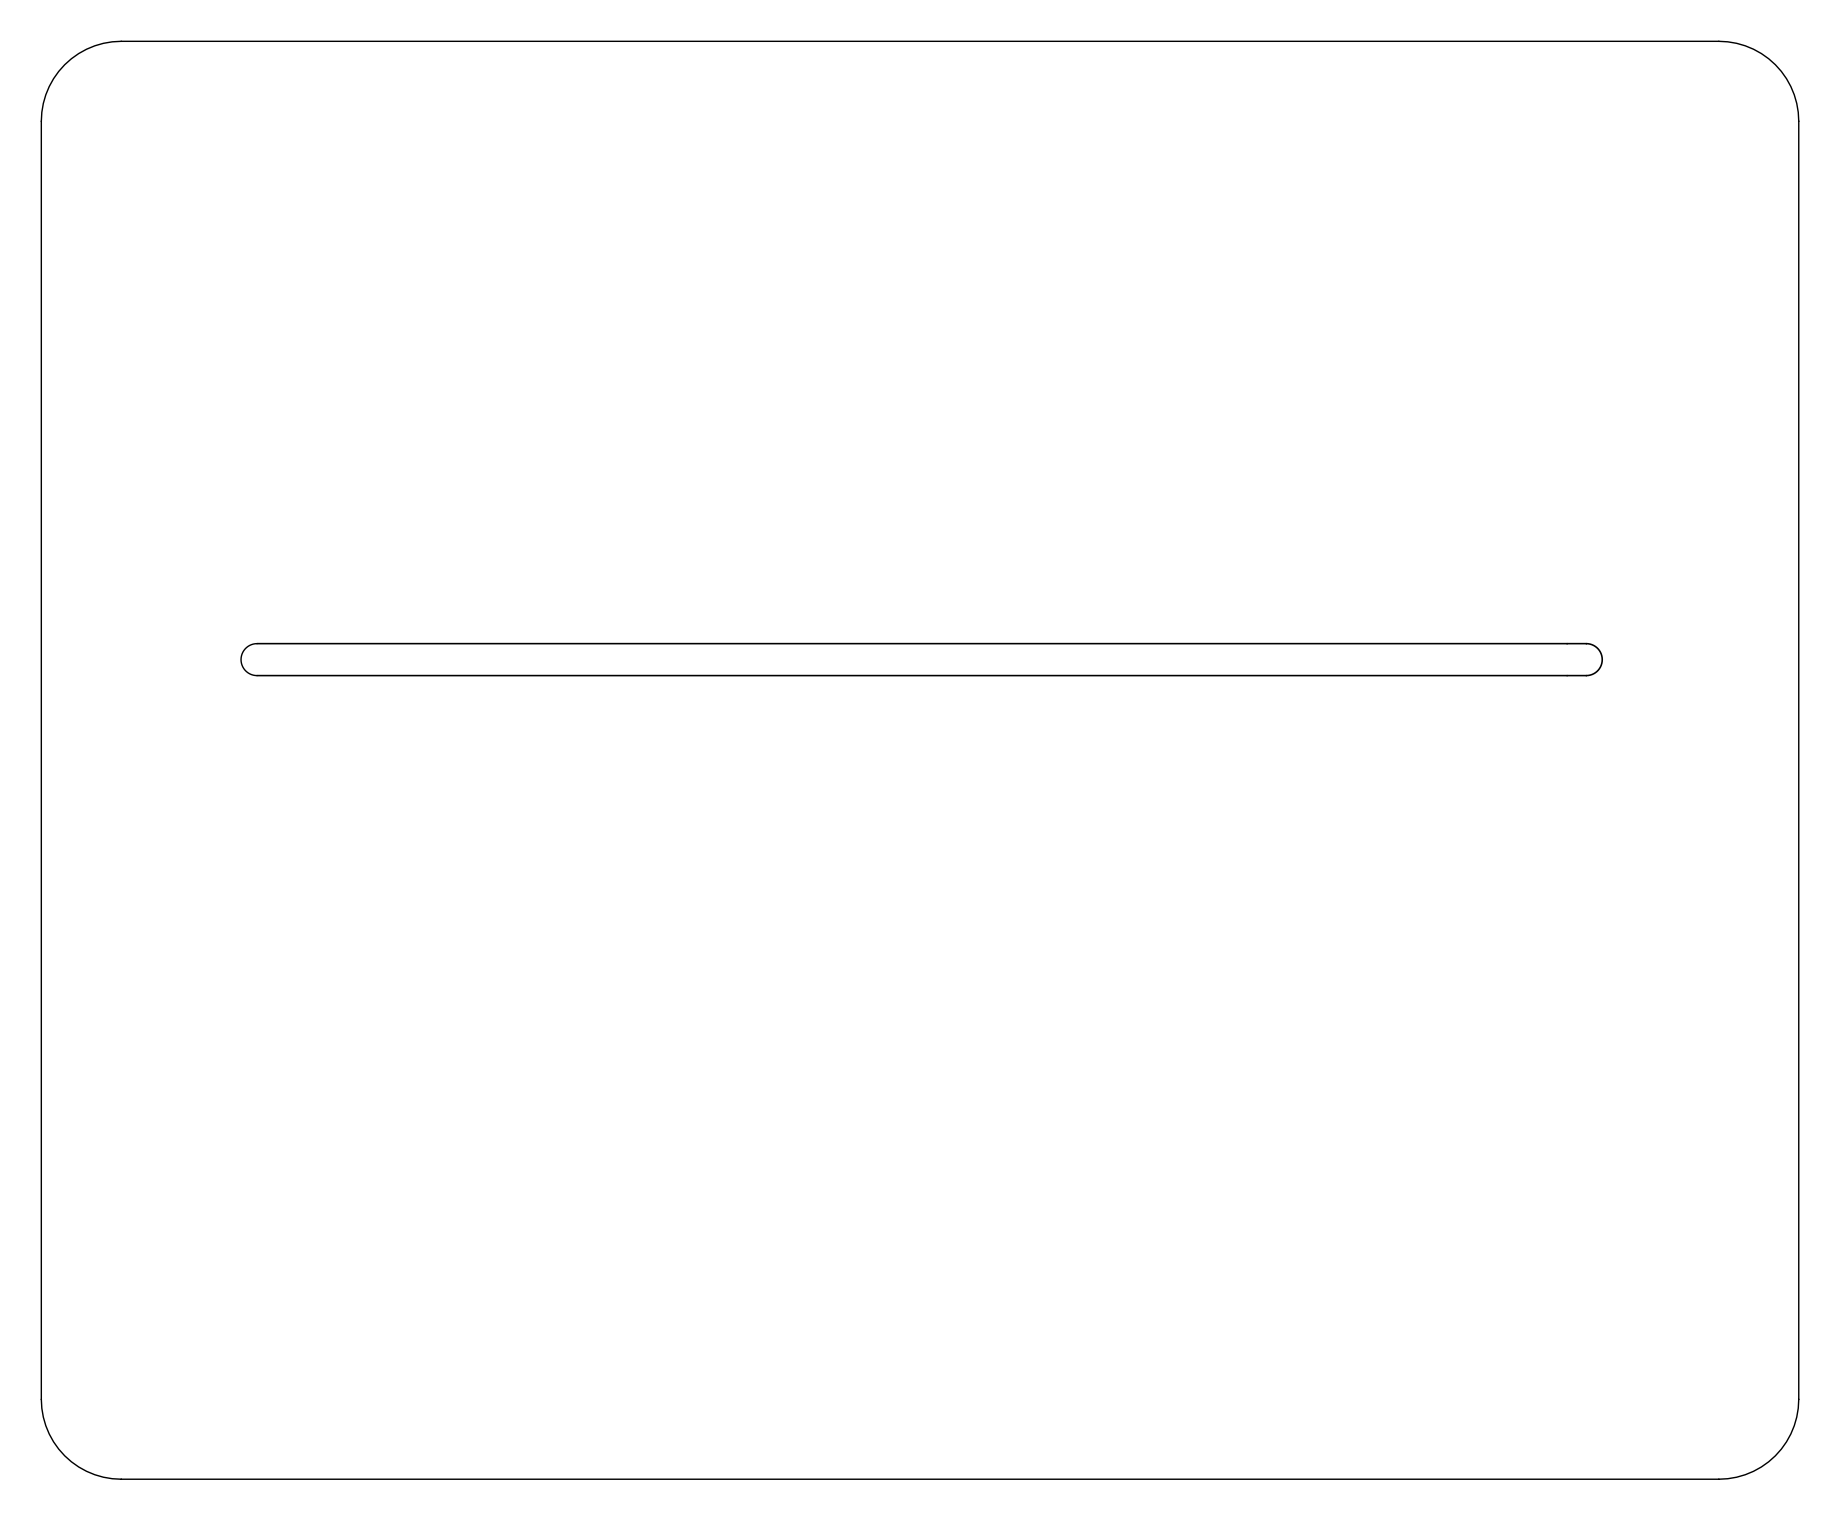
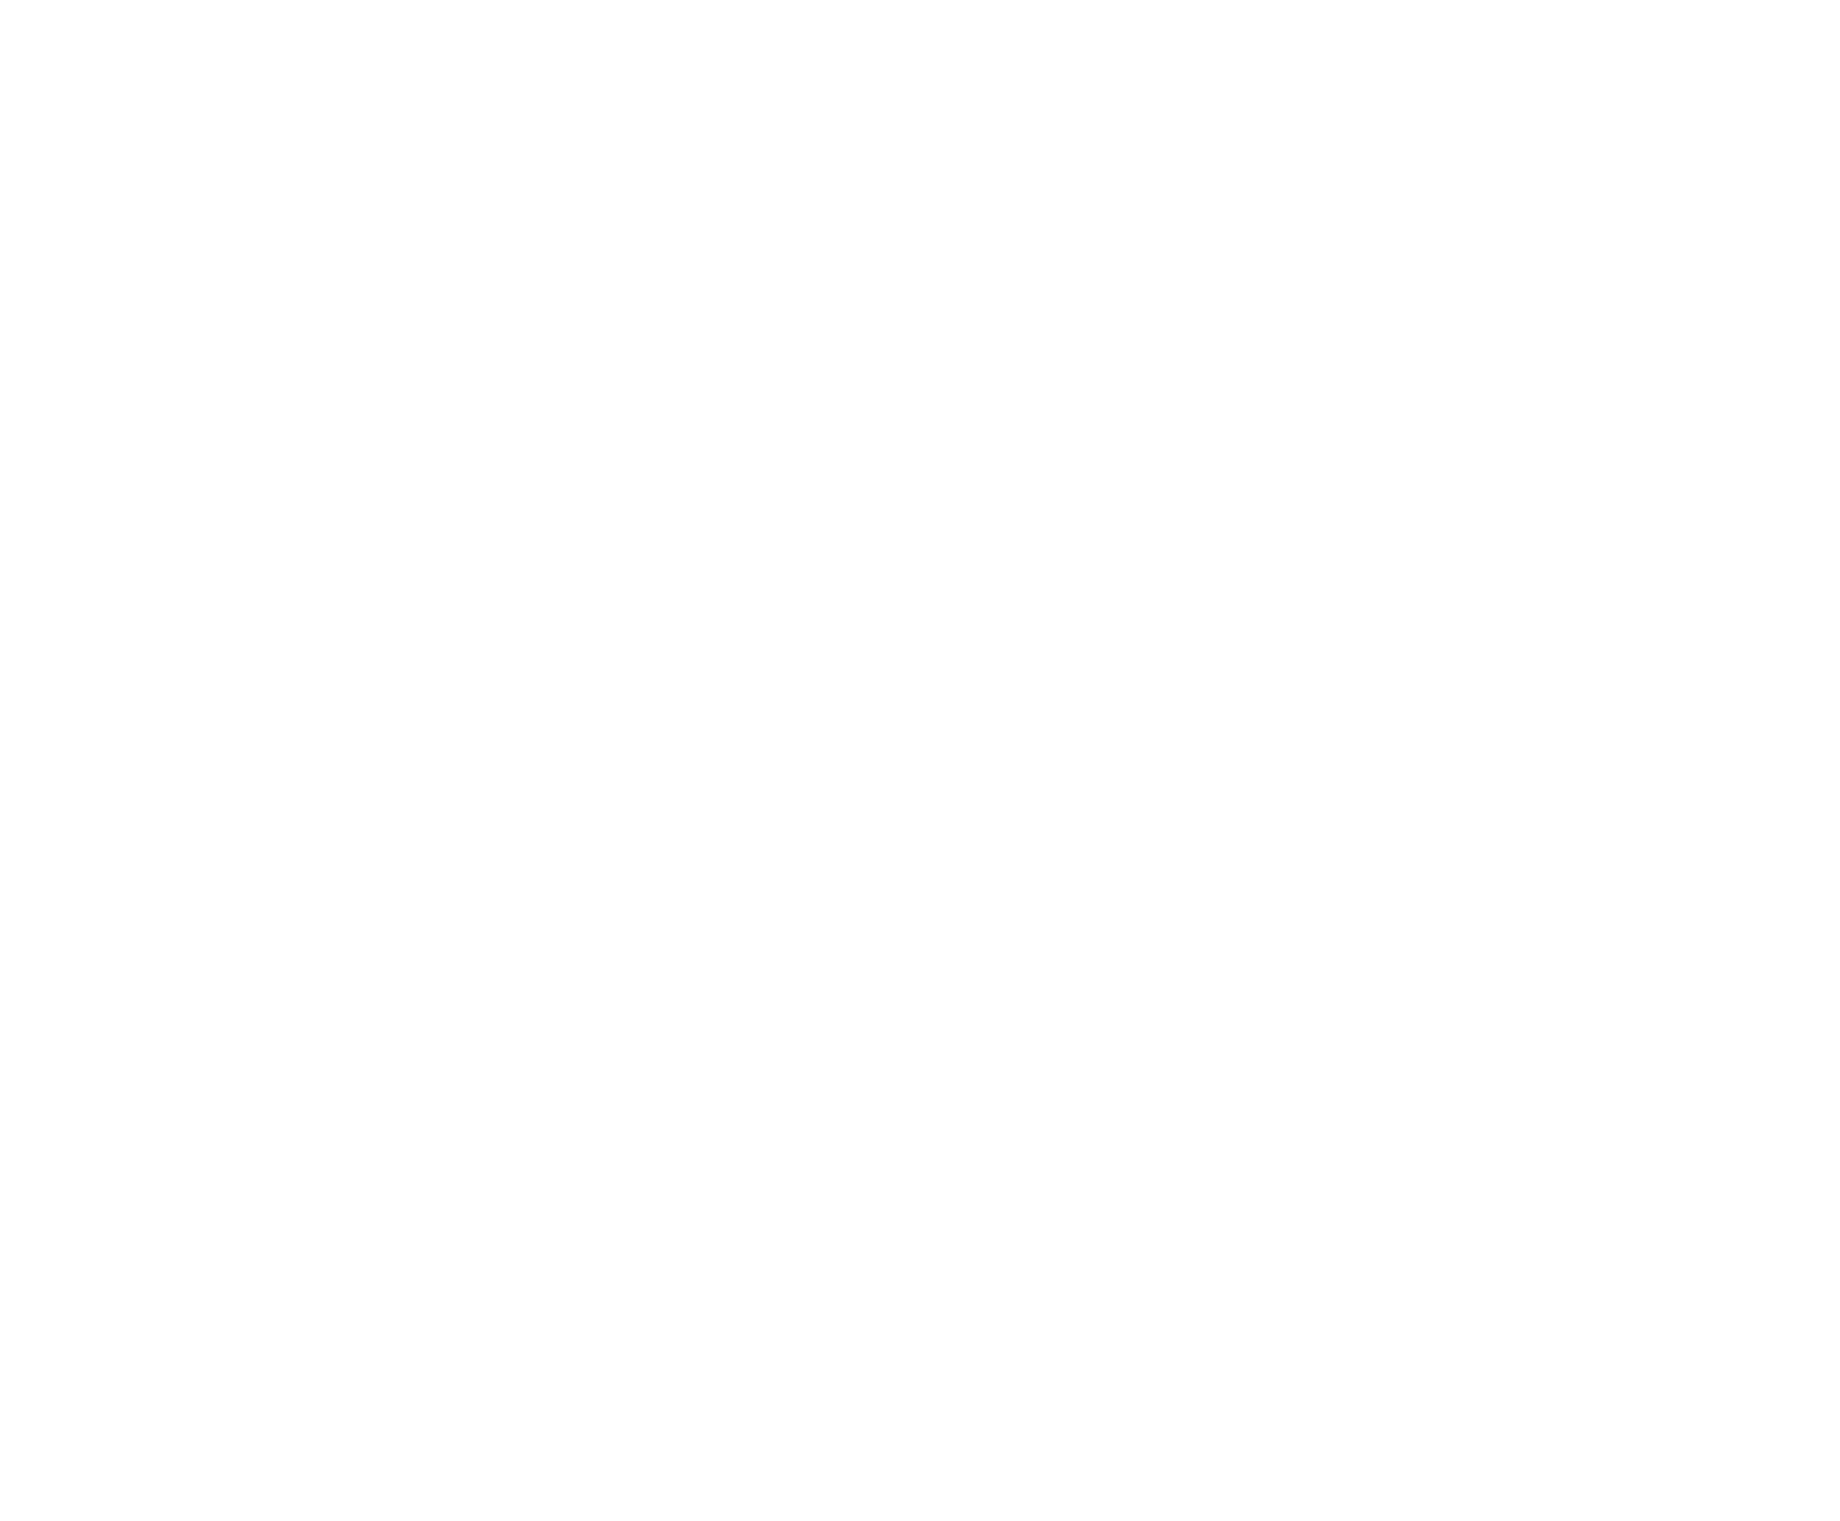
board edge: (1718, 41) (121, 41) (94, 45) (71, 58) (58, 71) (49, 86) (43, 103) (41, 121) (41, 1399) (45, 1425) (58, 1449) (71, 1461) (86, 1471) (103, 1477) (121, 1479) (1718, 1479) (1745, 1474) (1768, 1461) (1781, 1449) (1790, 1434) (1796, 1417) (1798, 1399) (1798, 121) (1794, 94) (1786, 78) (1775, 64) (1753, 49) (1736, 43) (1718, 41) -> none
board edge: (1586, 643) (257, 643) (246, 647) (241, 659) (246, 671) (257, 675) (1586, 675) (1596, 671) (1602, 659) (1596, 647) (1586, 643) -> none

